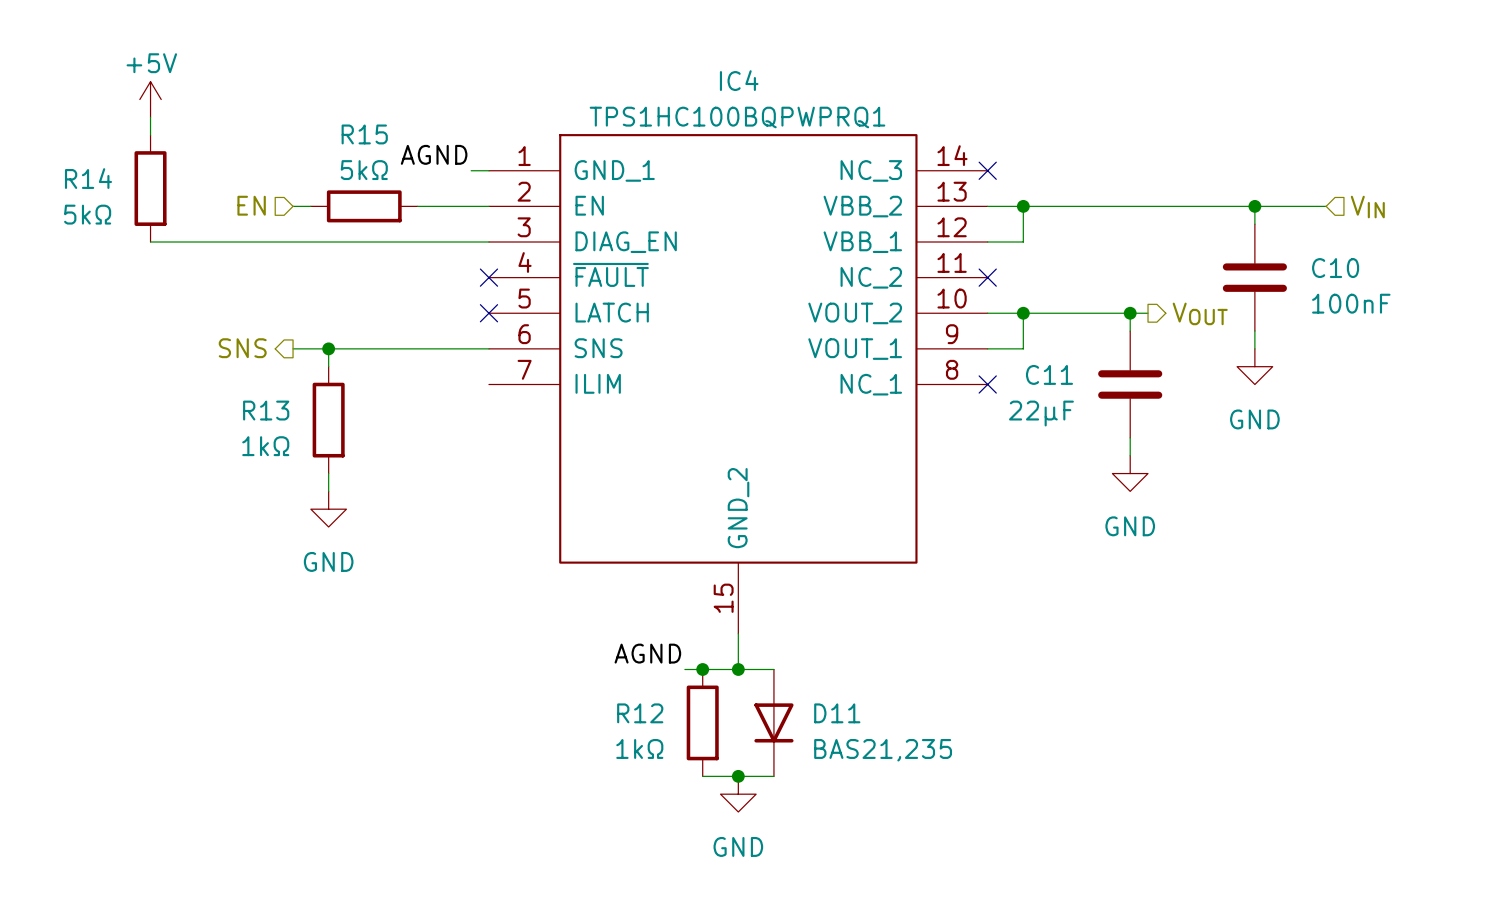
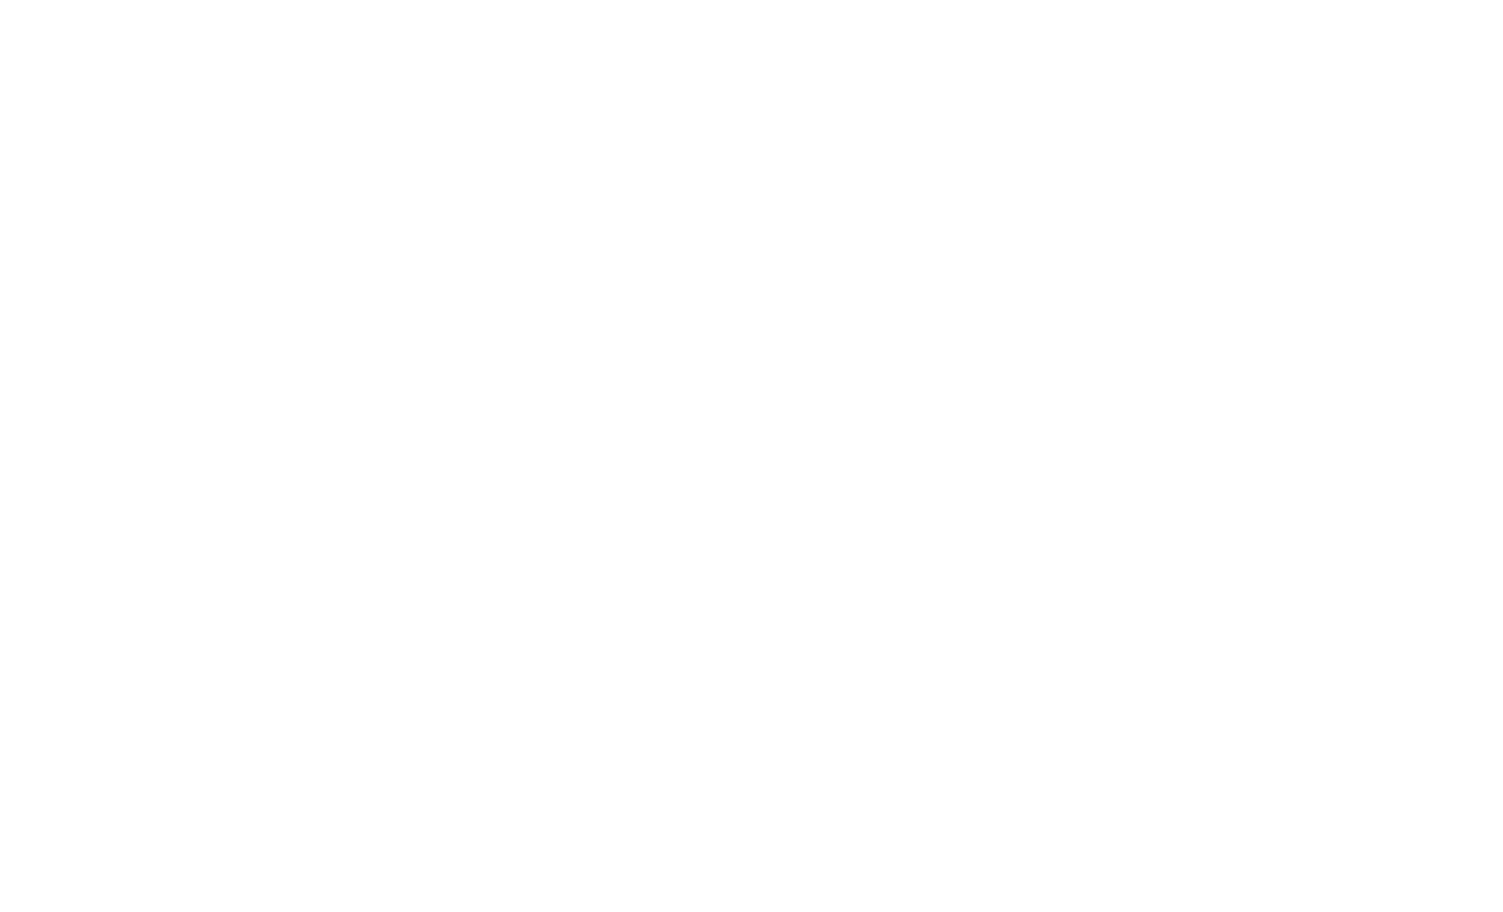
power symbol: +5V (150, 99) -> none
wire: (150, 117) (150, 135) -> none
label: AGND (434, 154) -> none
wire: (471, 170) (488, 170) -> none
no-connect mark: (987, 170) -> none
R14: 5kΩ (150, 188) -> none
hierarchical label: EN (251, 205) -> none
wire: (293, 206) (310, 206) -> none
R15: 5kΩ (364, 206) -> none
wire: (417, 206) (488, 206) -> none
wire: (987, 206) (1326, 206) -> none
wire: (1023, 206) (1023, 242) (987, 242) -> none
junction: (1023, 206) -> none
wire: (1254, 206) (1254, 224) -> none
junction: (1254, 206) -> none
hierarchical label: VIN (1367, 207) -> none
wire: (150, 242) (488, 242) -> none
no-connect mark: (488, 277) -> none
no-connect mark: (987, 277) -> none
C10: 100nF (1254, 277) -> none
no-connect mark: (488, 313) -> none
wire: (987, 313) (1148, 313) -> none
wire: (1023, 313) (1023, 348) (987, 348) -> none
junction: (1023, 313) -> none
wire: (1130, 313) (1130, 331) -> none
junction: (1130, 313) -> none
hierarchical label: VOUT (1200, 313) -> none
wire: (1254, 331) (1254, 348) -> none
hierarchical label: SNS (242, 348) -> none
wire: (293, 348) (488, 348) -> none
wire: (328, 348) (328, 366) -> none
junction: (328, 348) -> none
power symbol: GND (1254, 366) -> none
IC4: TPS1HC100BQPWPRQ1 (738, 383) -> none
no-connect mark: (987, 384) -> none
C11: 22µF (1130, 384) -> none
R13: 1kΩ (328, 420) -> none
wire: (1130, 437) (1130, 455) -> none
wire: (328, 473) (328, 491) -> none
power symbol: GND (1130, 473) -> none
power symbol: GND (328, 509) -> none
wire: (738, 633) (738, 669) -> none
label: AGND (647, 653) -> none
wire: (684, 669) (773, 669) -> none
junction: (702, 669) -> none
junction: (738, 669) -> none
R12: 1kΩ (702, 722) -> none
D11: BAS21,235 (773, 722) -> none
wire: (702, 776) (773, 776) -> none
junction: (738, 776) -> none
power symbol: GND (738, 794) -> none

